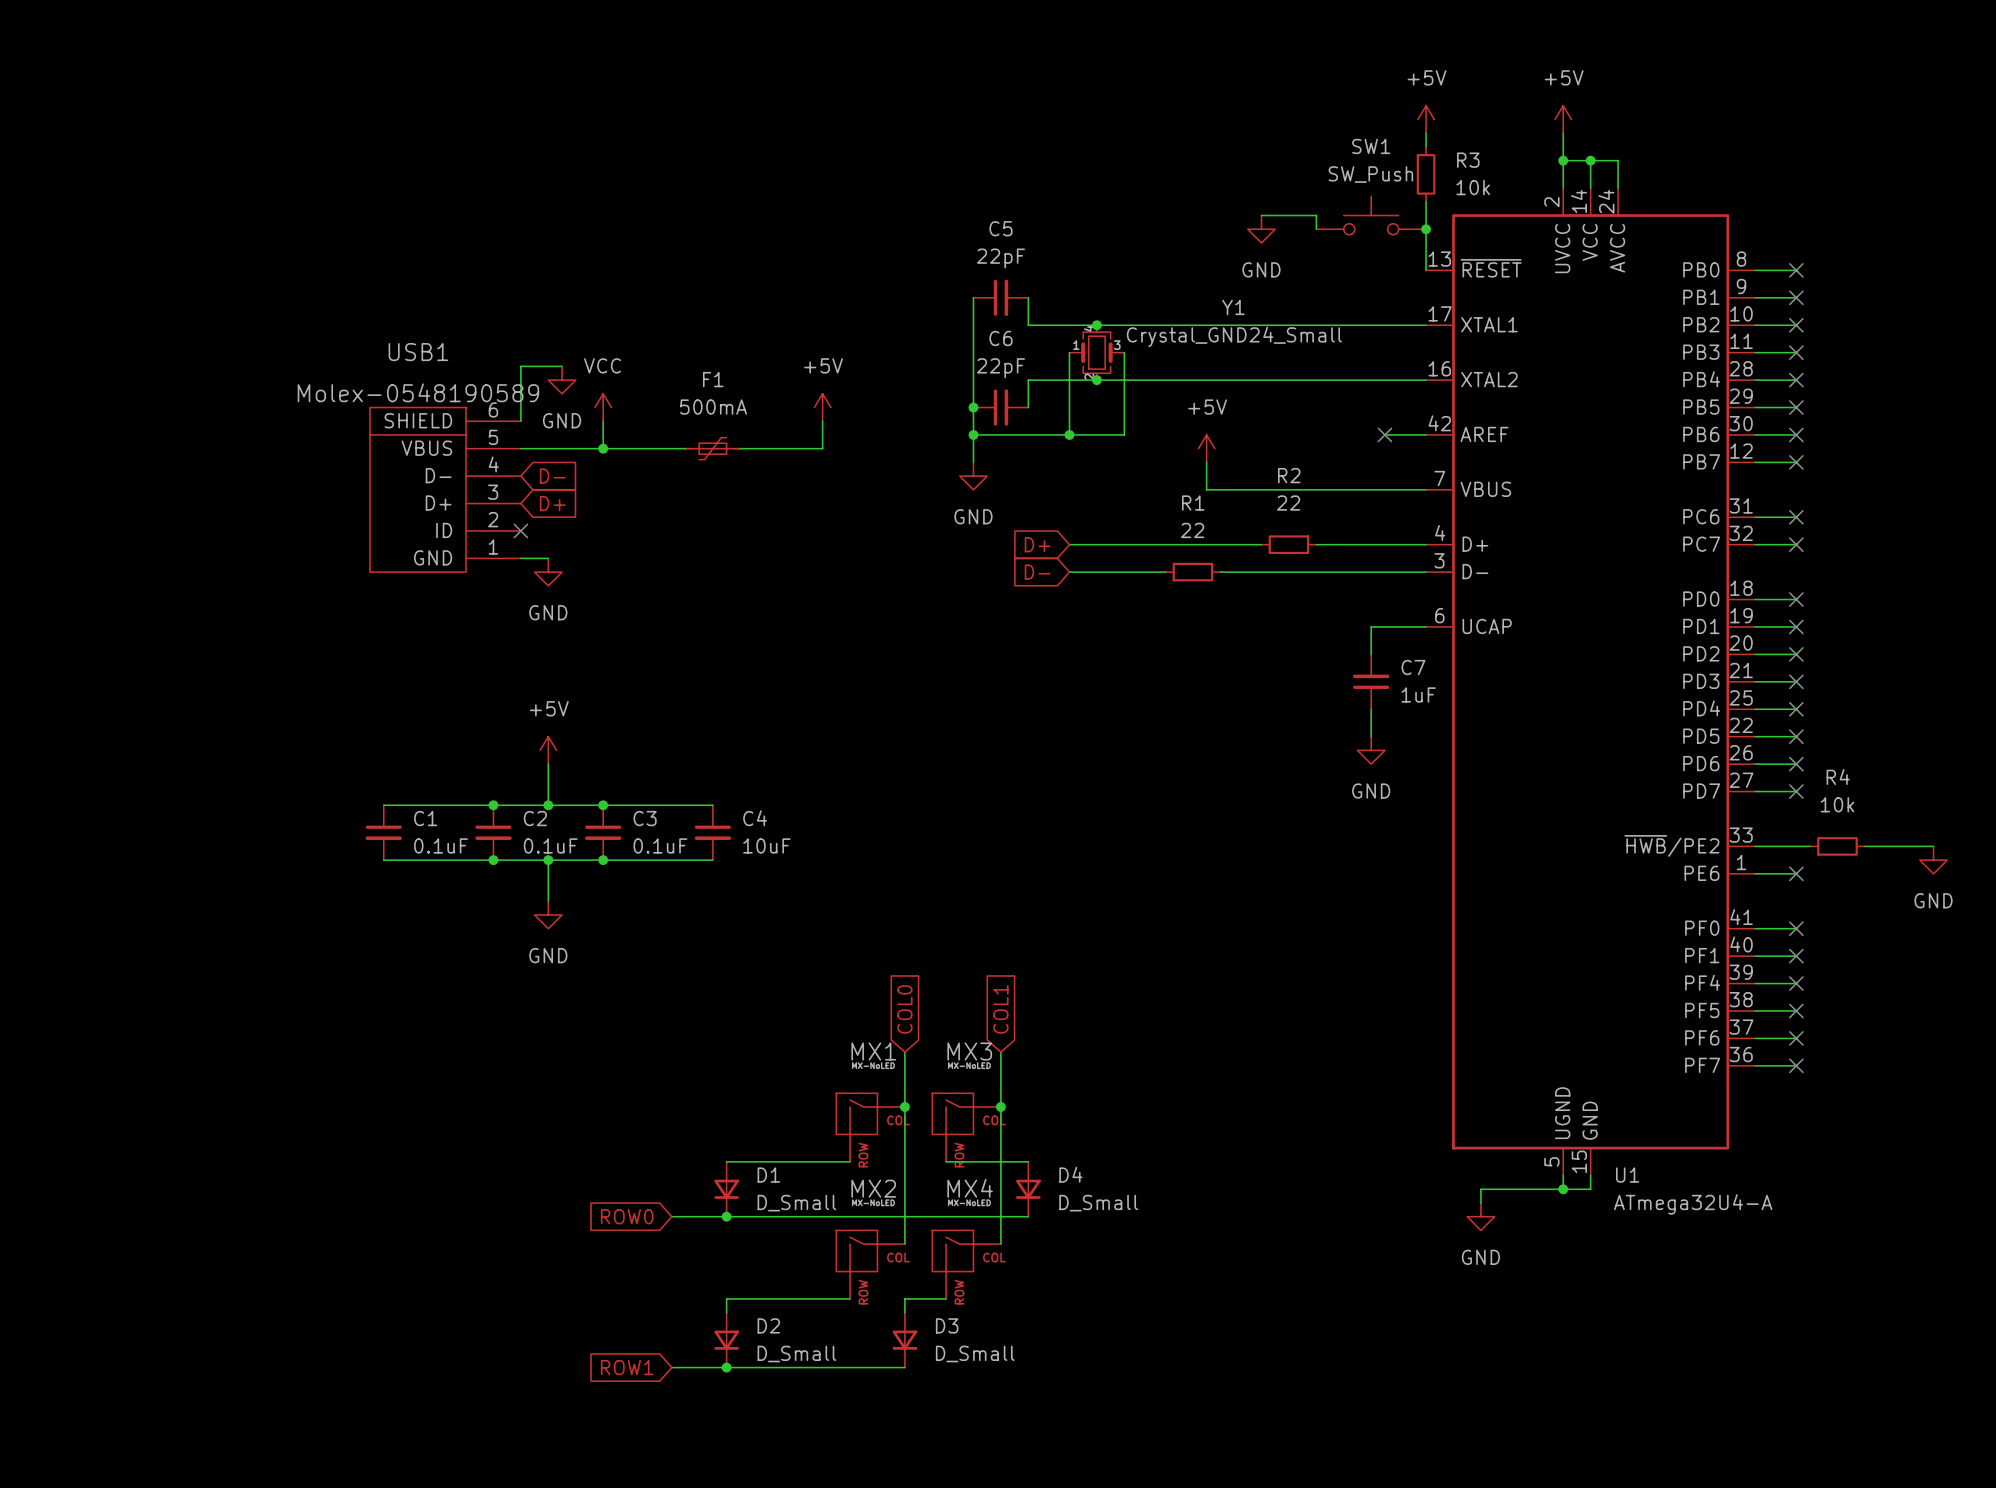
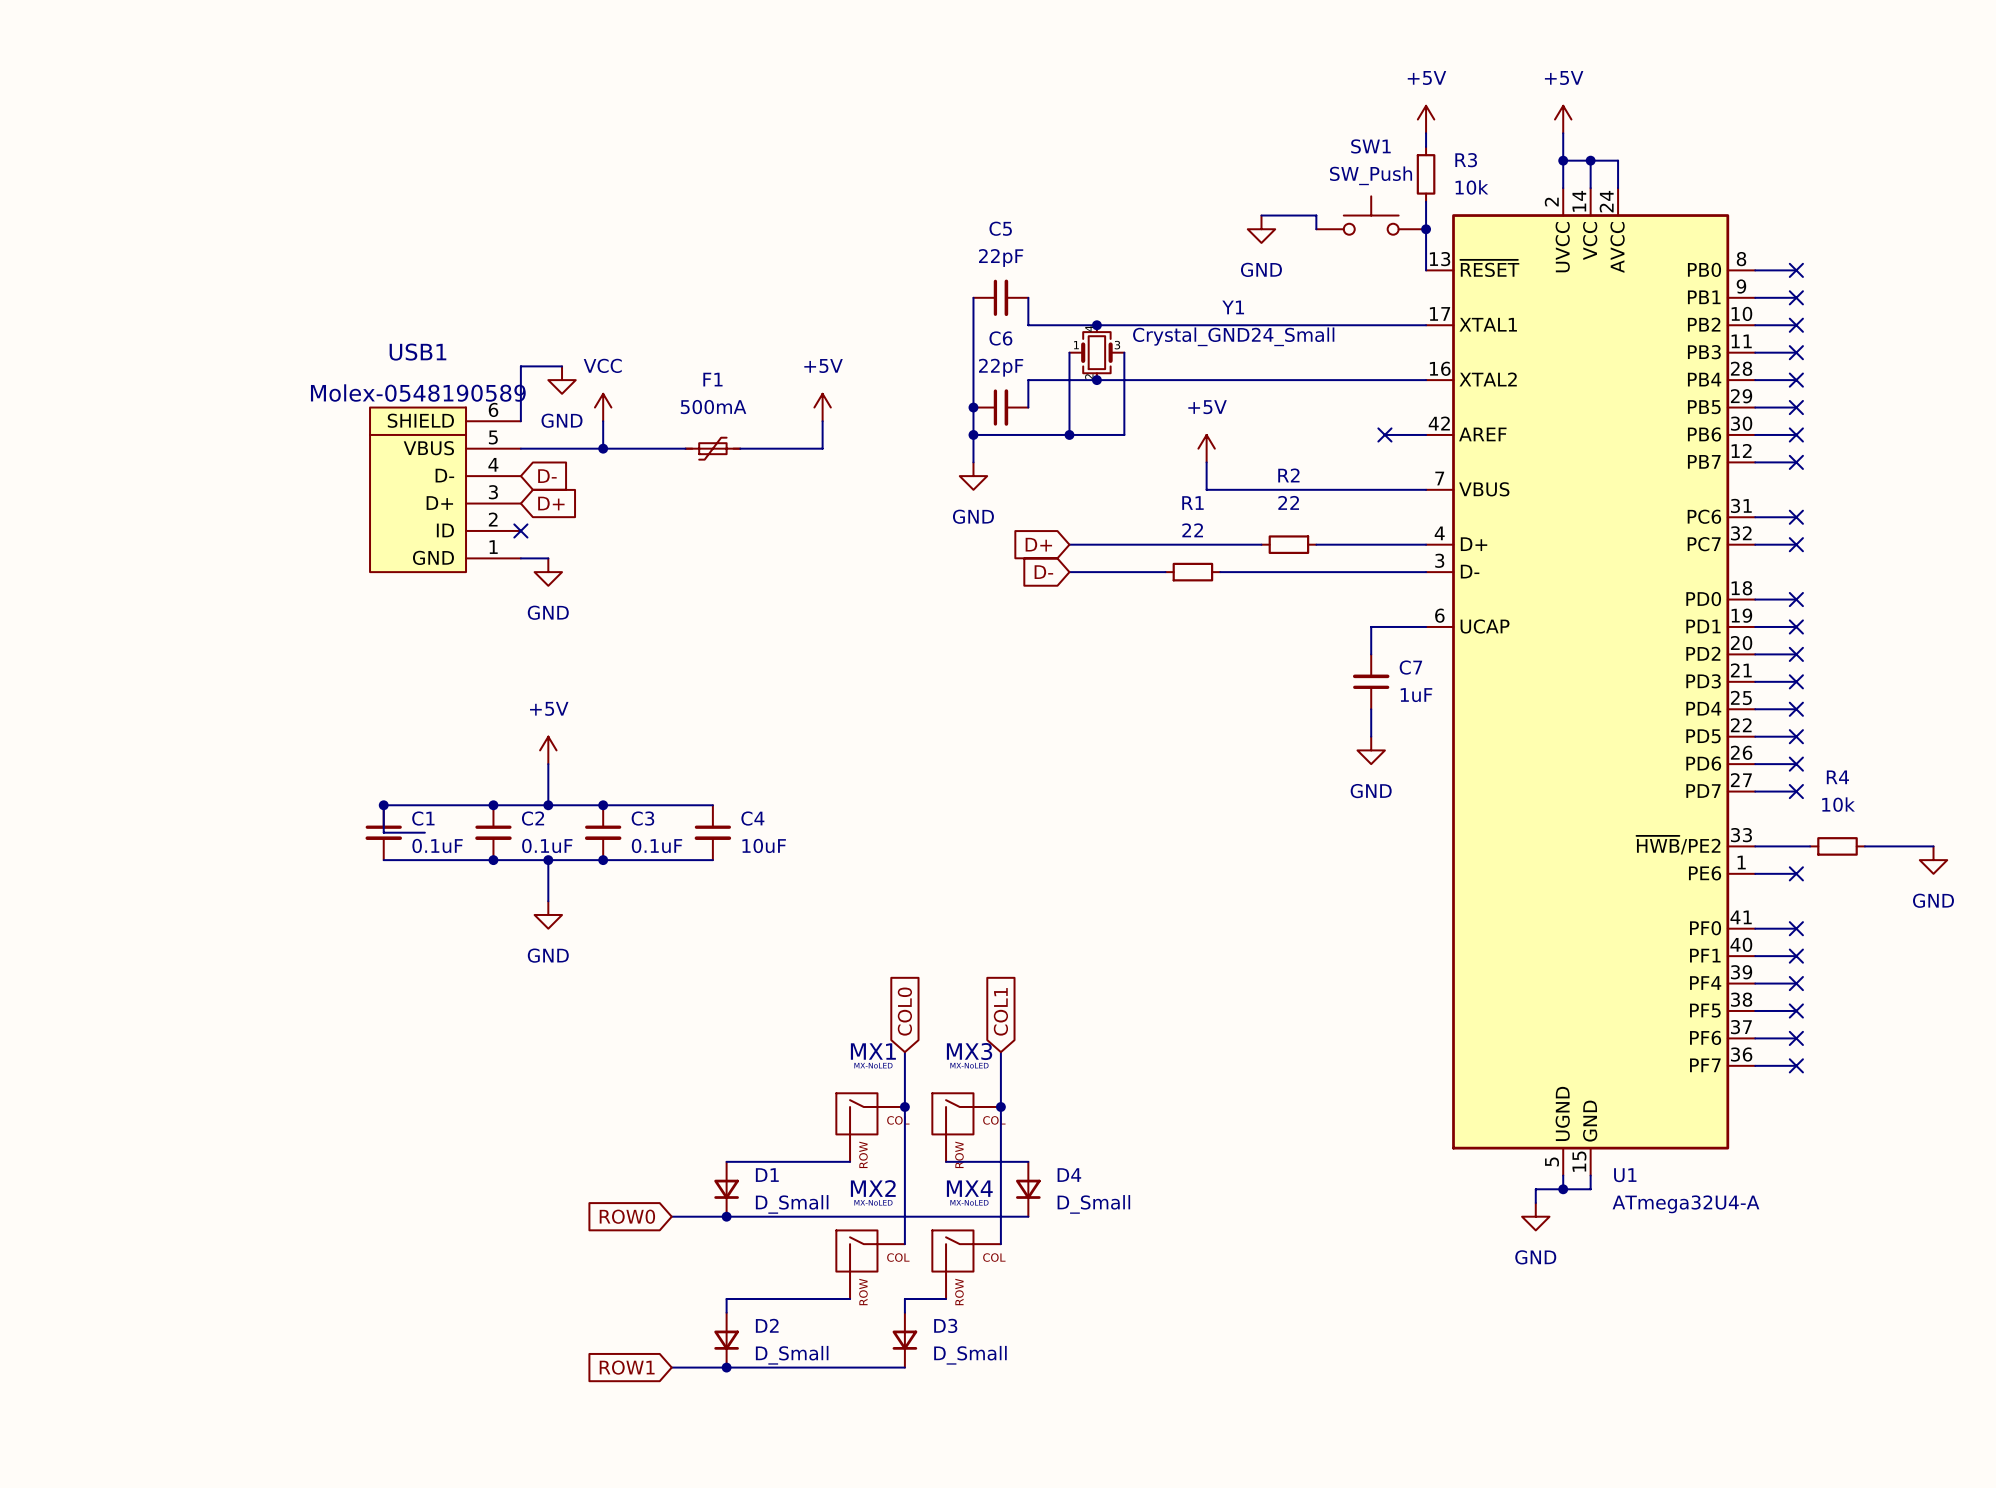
wire: none -> (383, 805) (383, 832) (424, 832)
junction: none -> (383, 805)
wire: (1535, 1189) (1480, 1189) (1480, 1202) -> (1535, 1189) (1535, 1202)
power symbol position: GND (1480, 1216) -> GND (1535, 1216)

